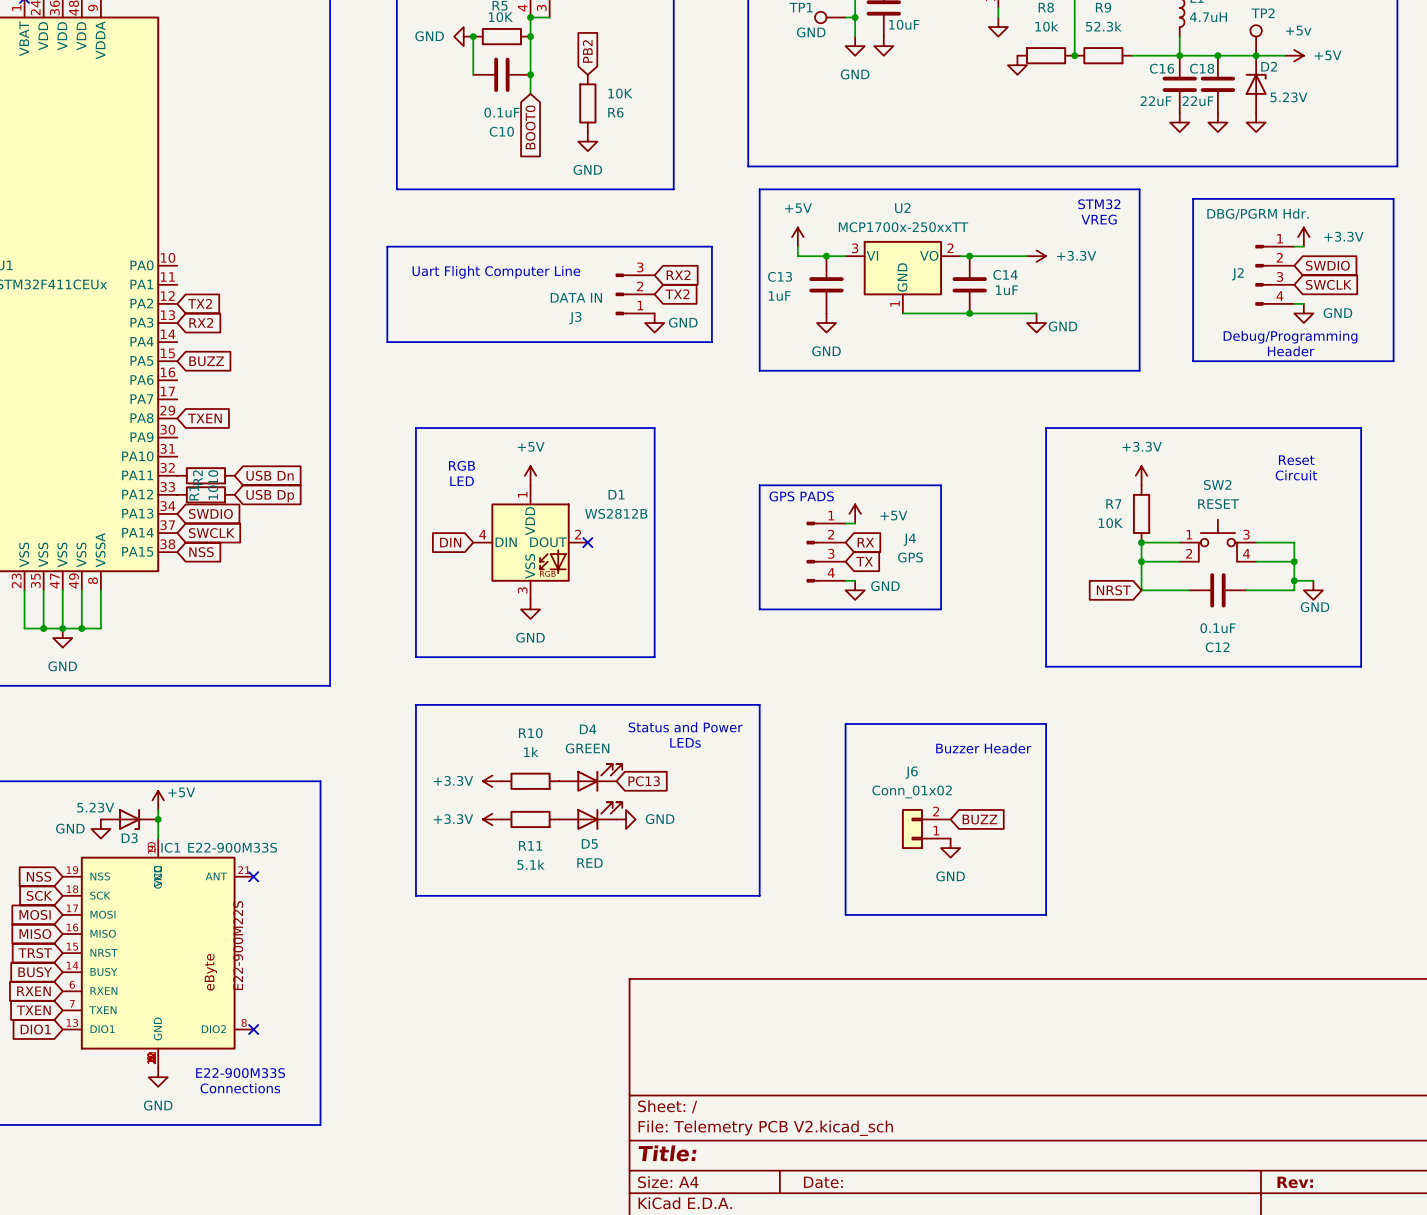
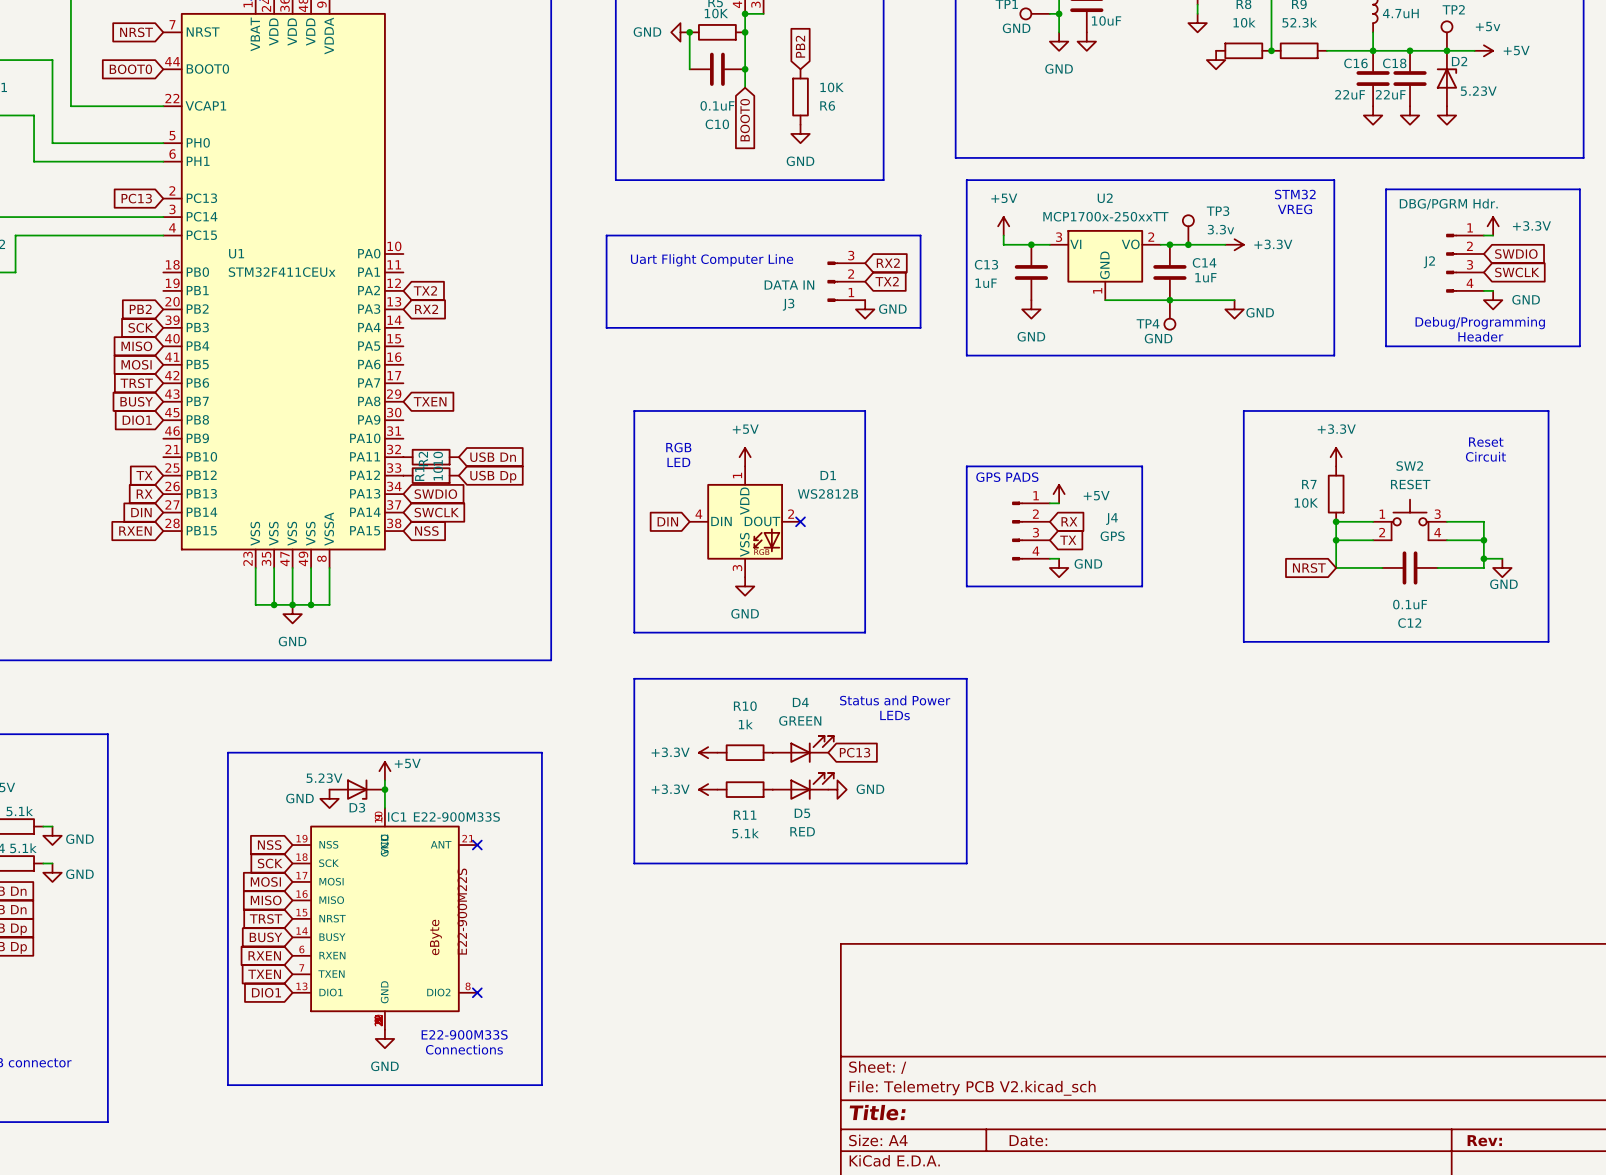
TP3: none -> 3.3v (1188, 229)
junction: none -> (1188, 244)
TP4: none -> GND (1169, 314)
global label: BUZZ (206, 361) -> none
line: (845, 723) (1046, 723) (1046, 914) (845, 914) (845, 723) -> none
text: Buzzer Header (983, 748) -> none
global label: BUZZ (979, 819) -> none
J6: Conn_01x02 (926, 829) -> none
power symbol: GND (950, 848) -> none

